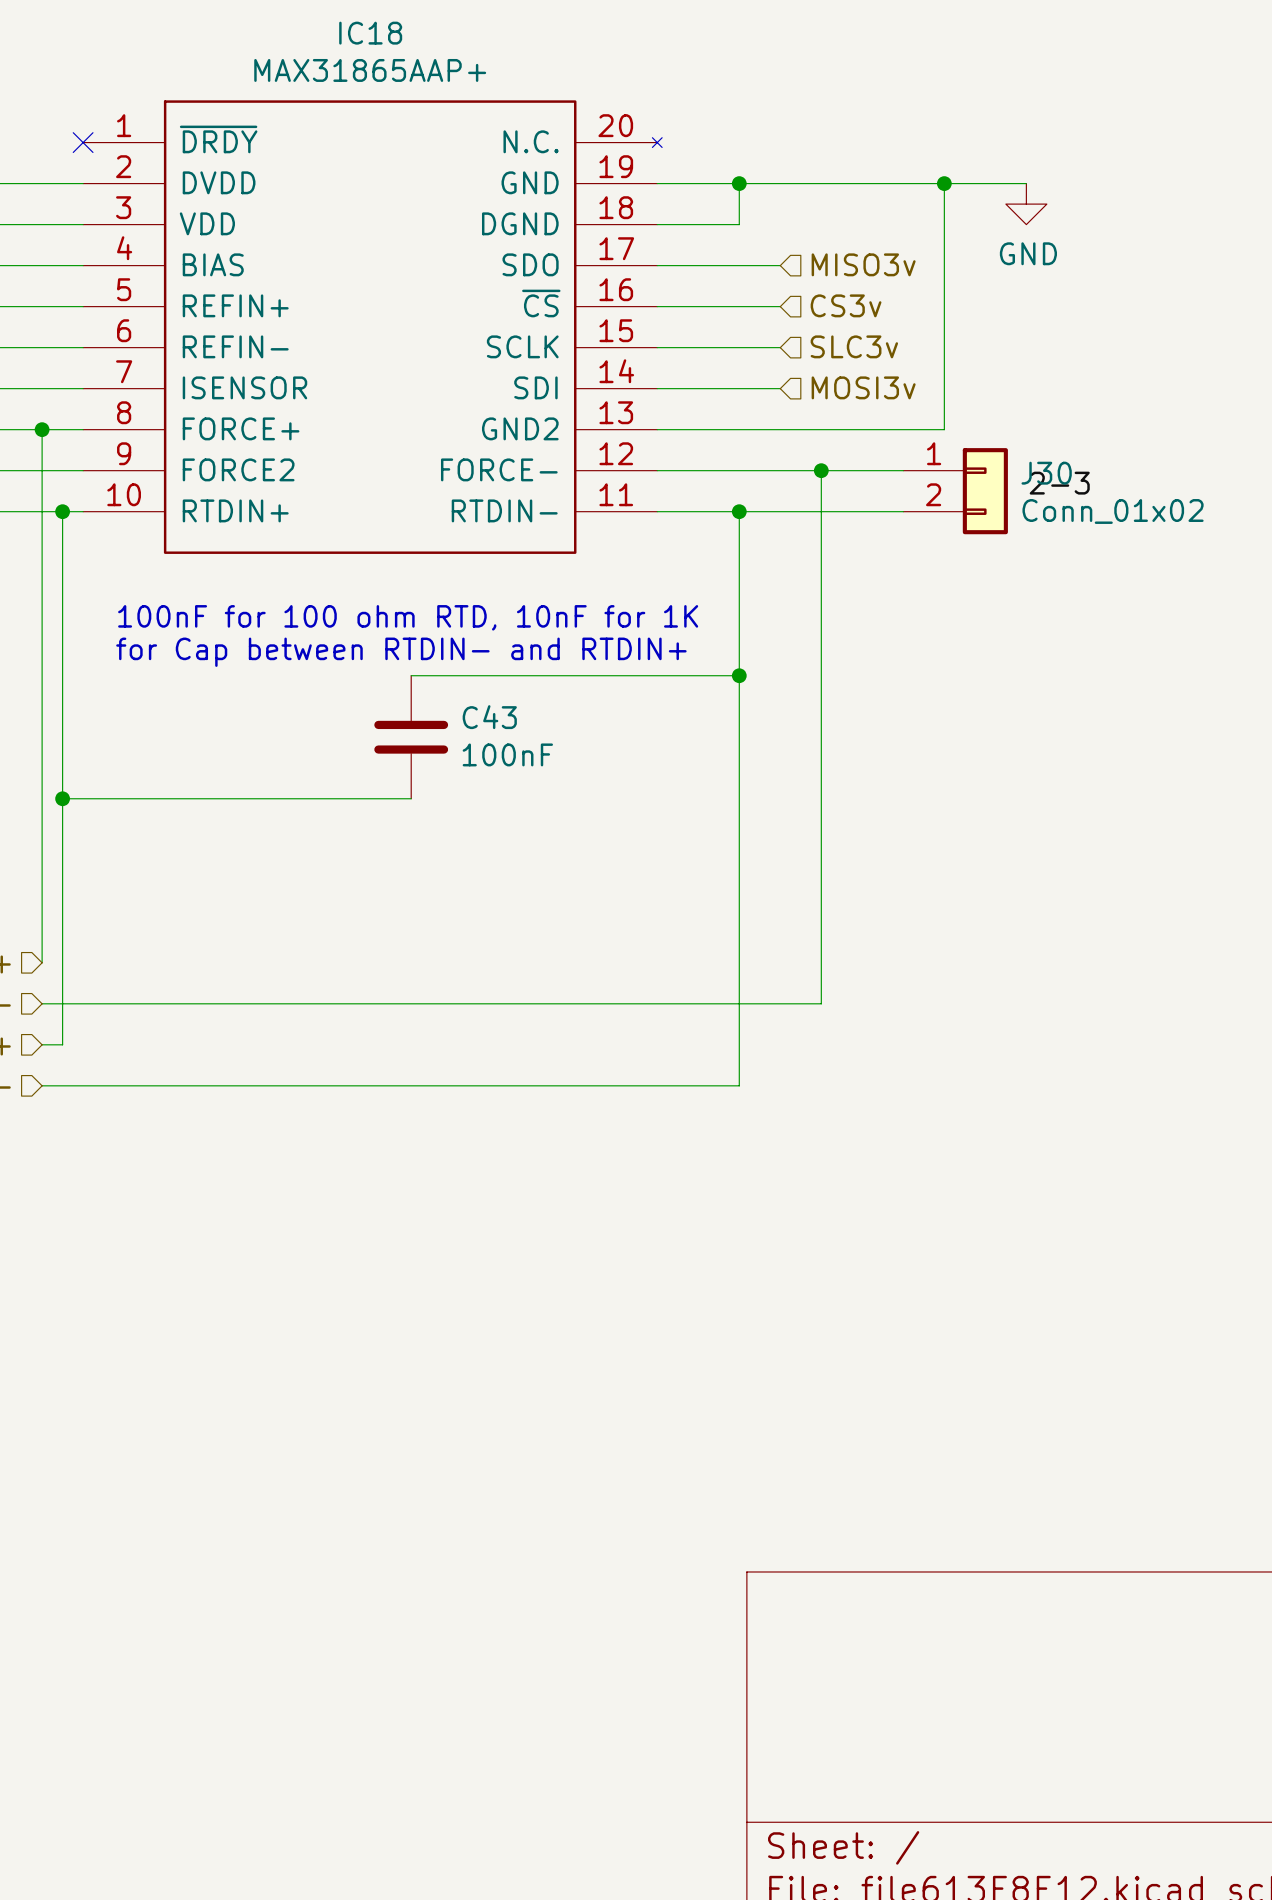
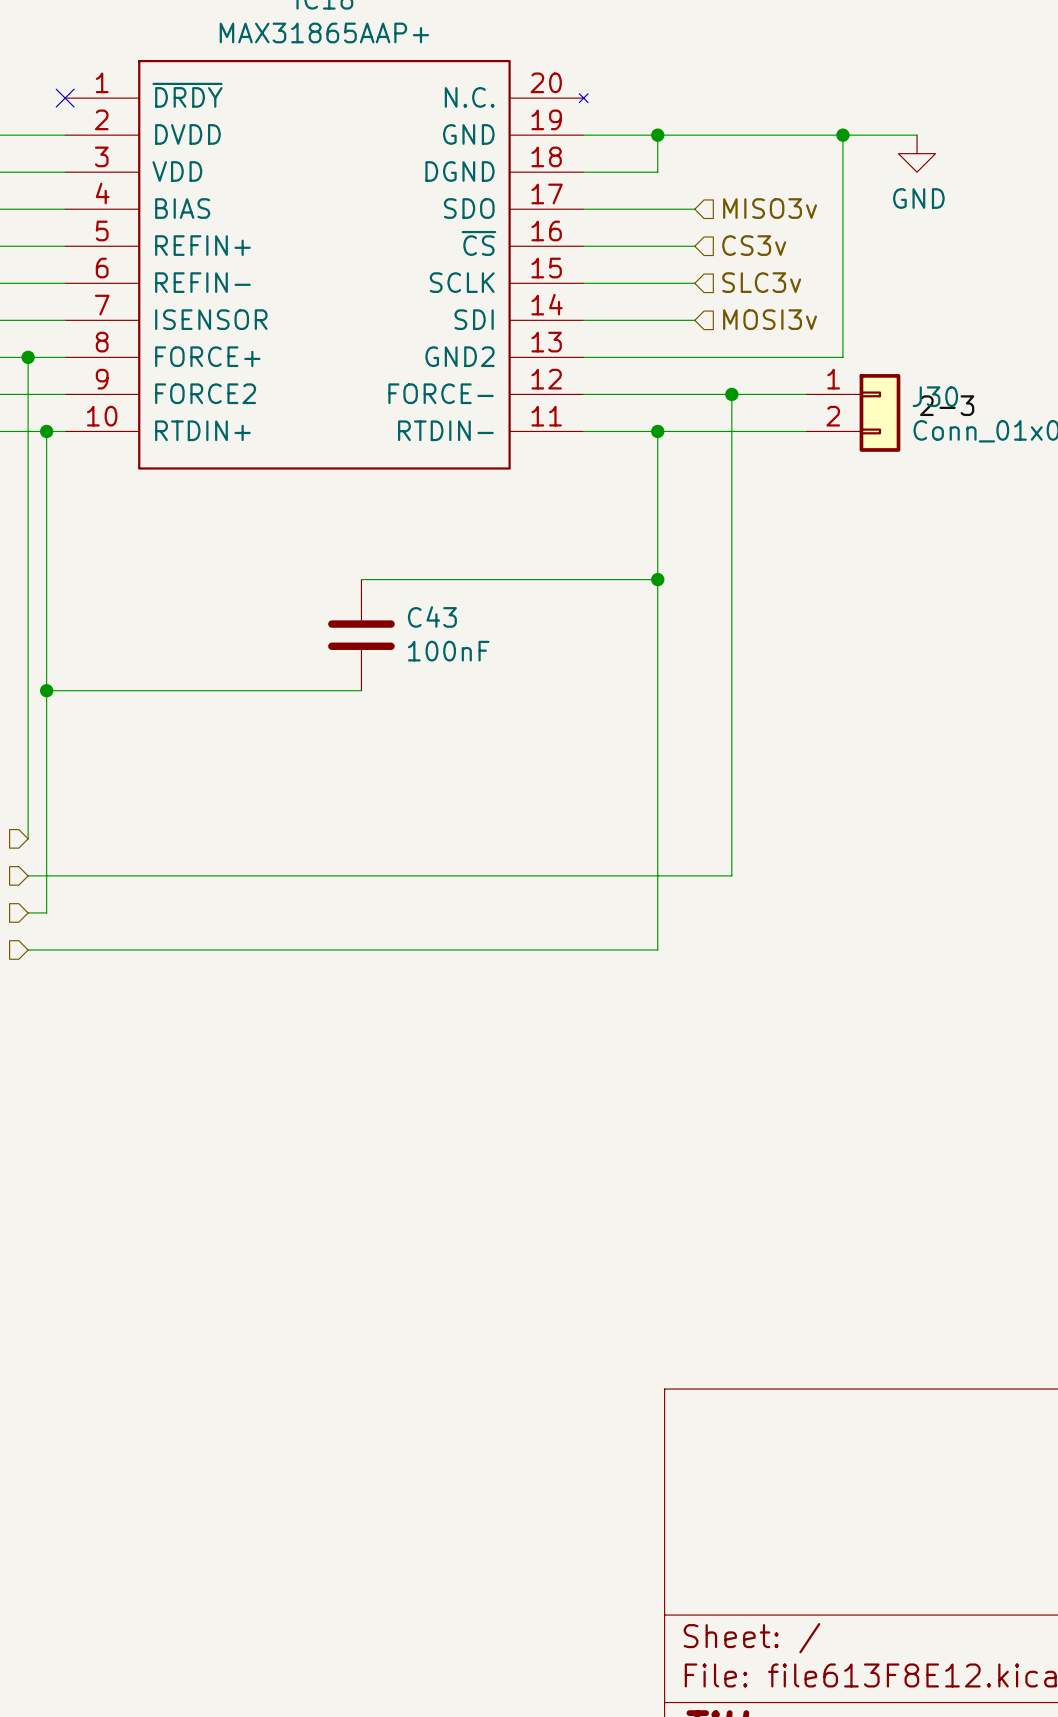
text: 100nF for 100 ohm RTD, 10nF for 1K (408, 617) -> none
text: for Cap between RTDIN- and RTDIN+ (401, 652) -> none

